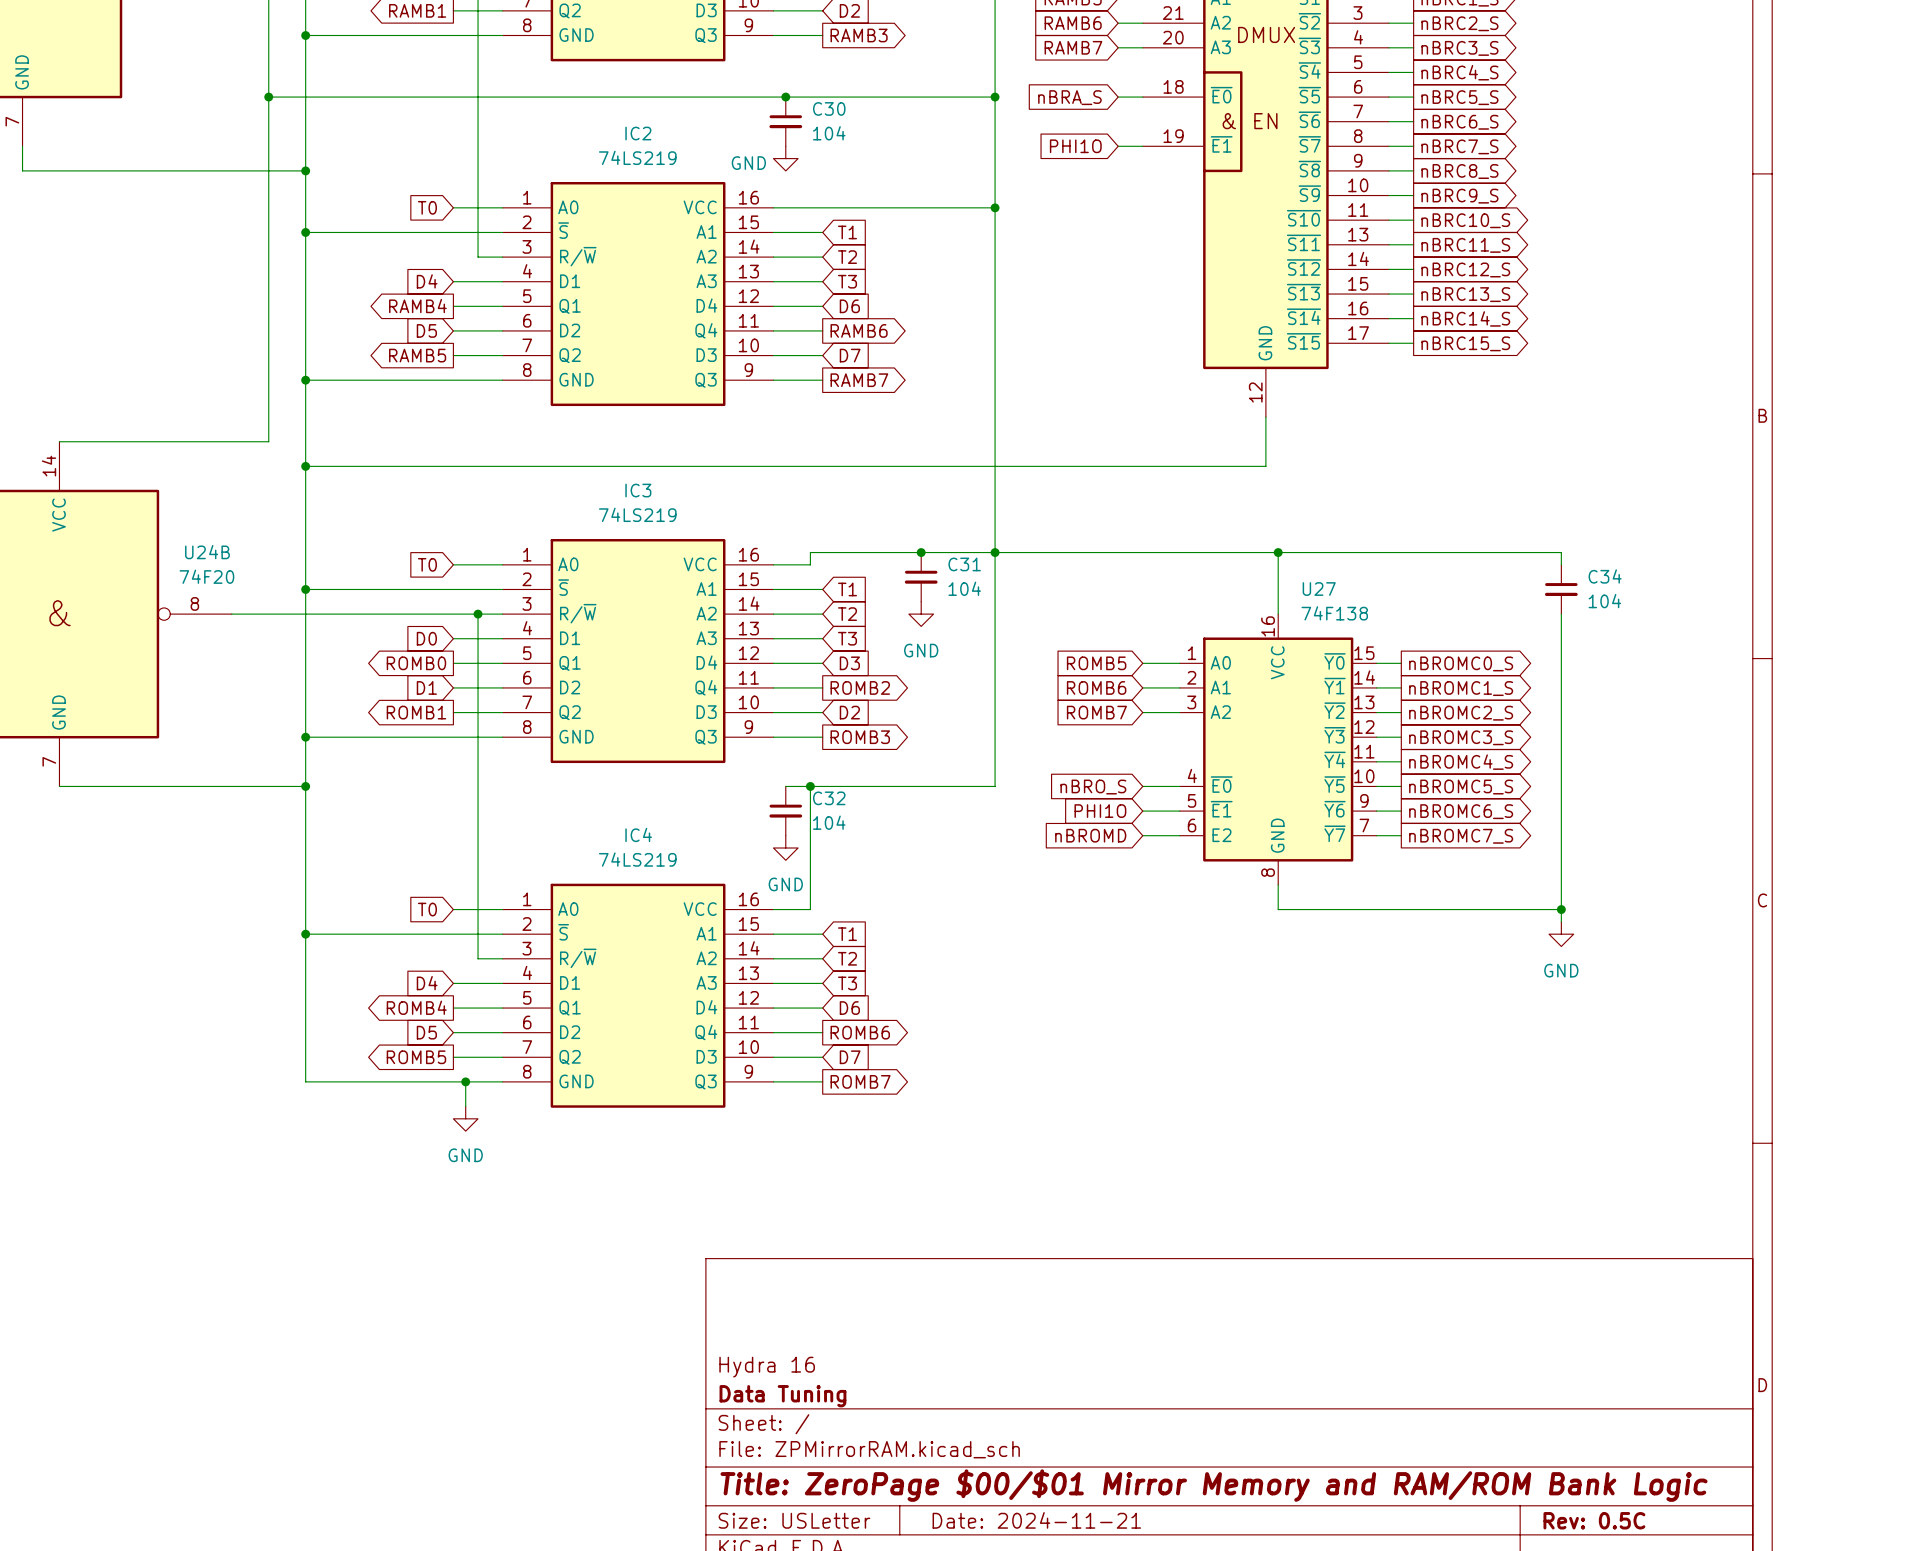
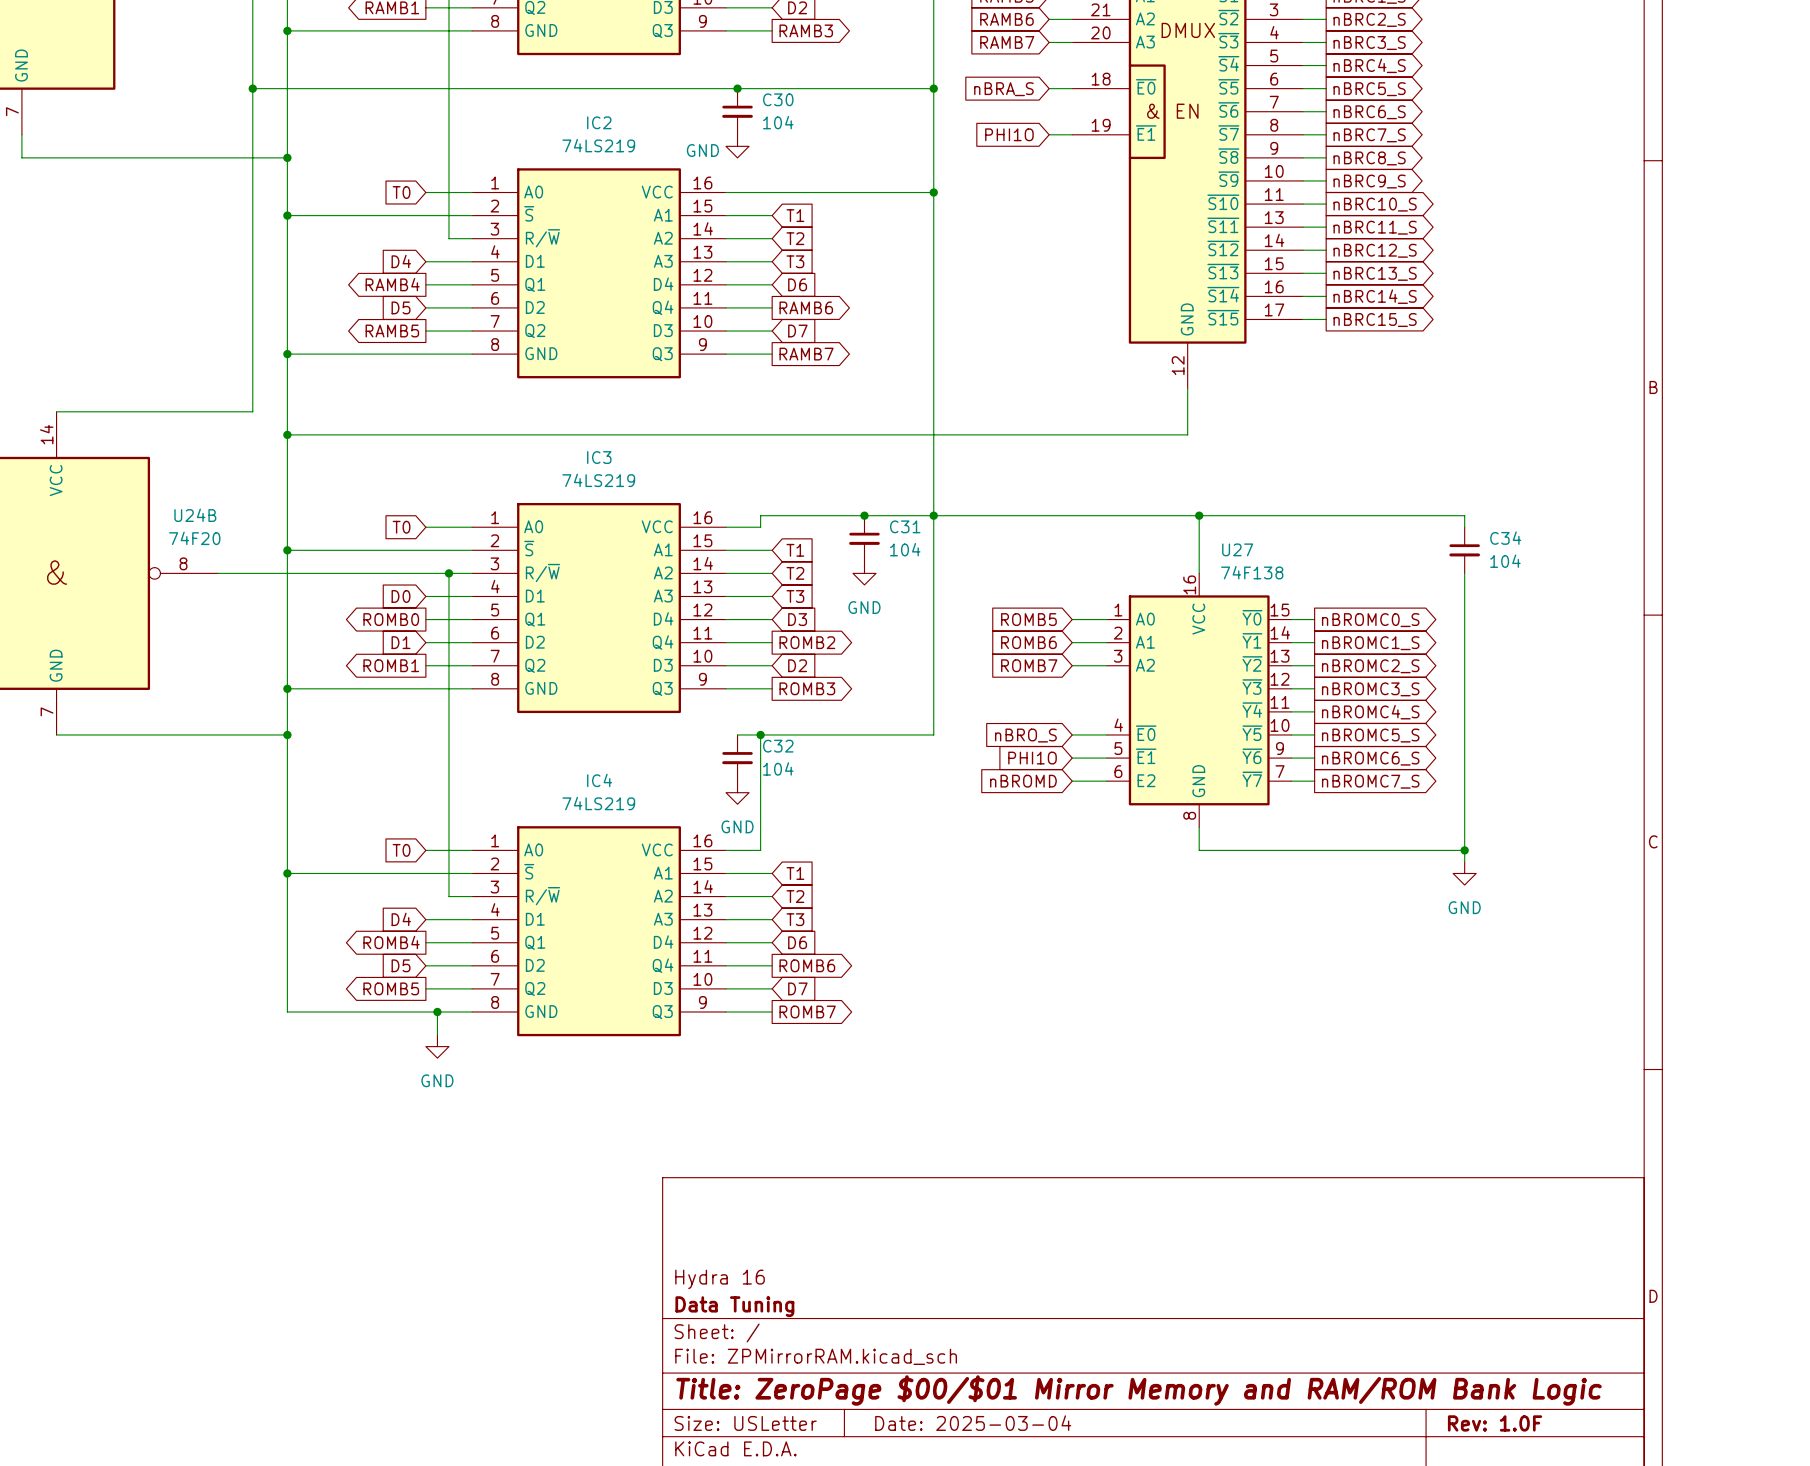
title block: Date: 2024-11-21 (1036, 1520) -> Date: 2025-03-04 (973, 1423)
title block: Rev: 0.5C (1594, 1520) -> Rev: 1.0F (1495, 1423)

